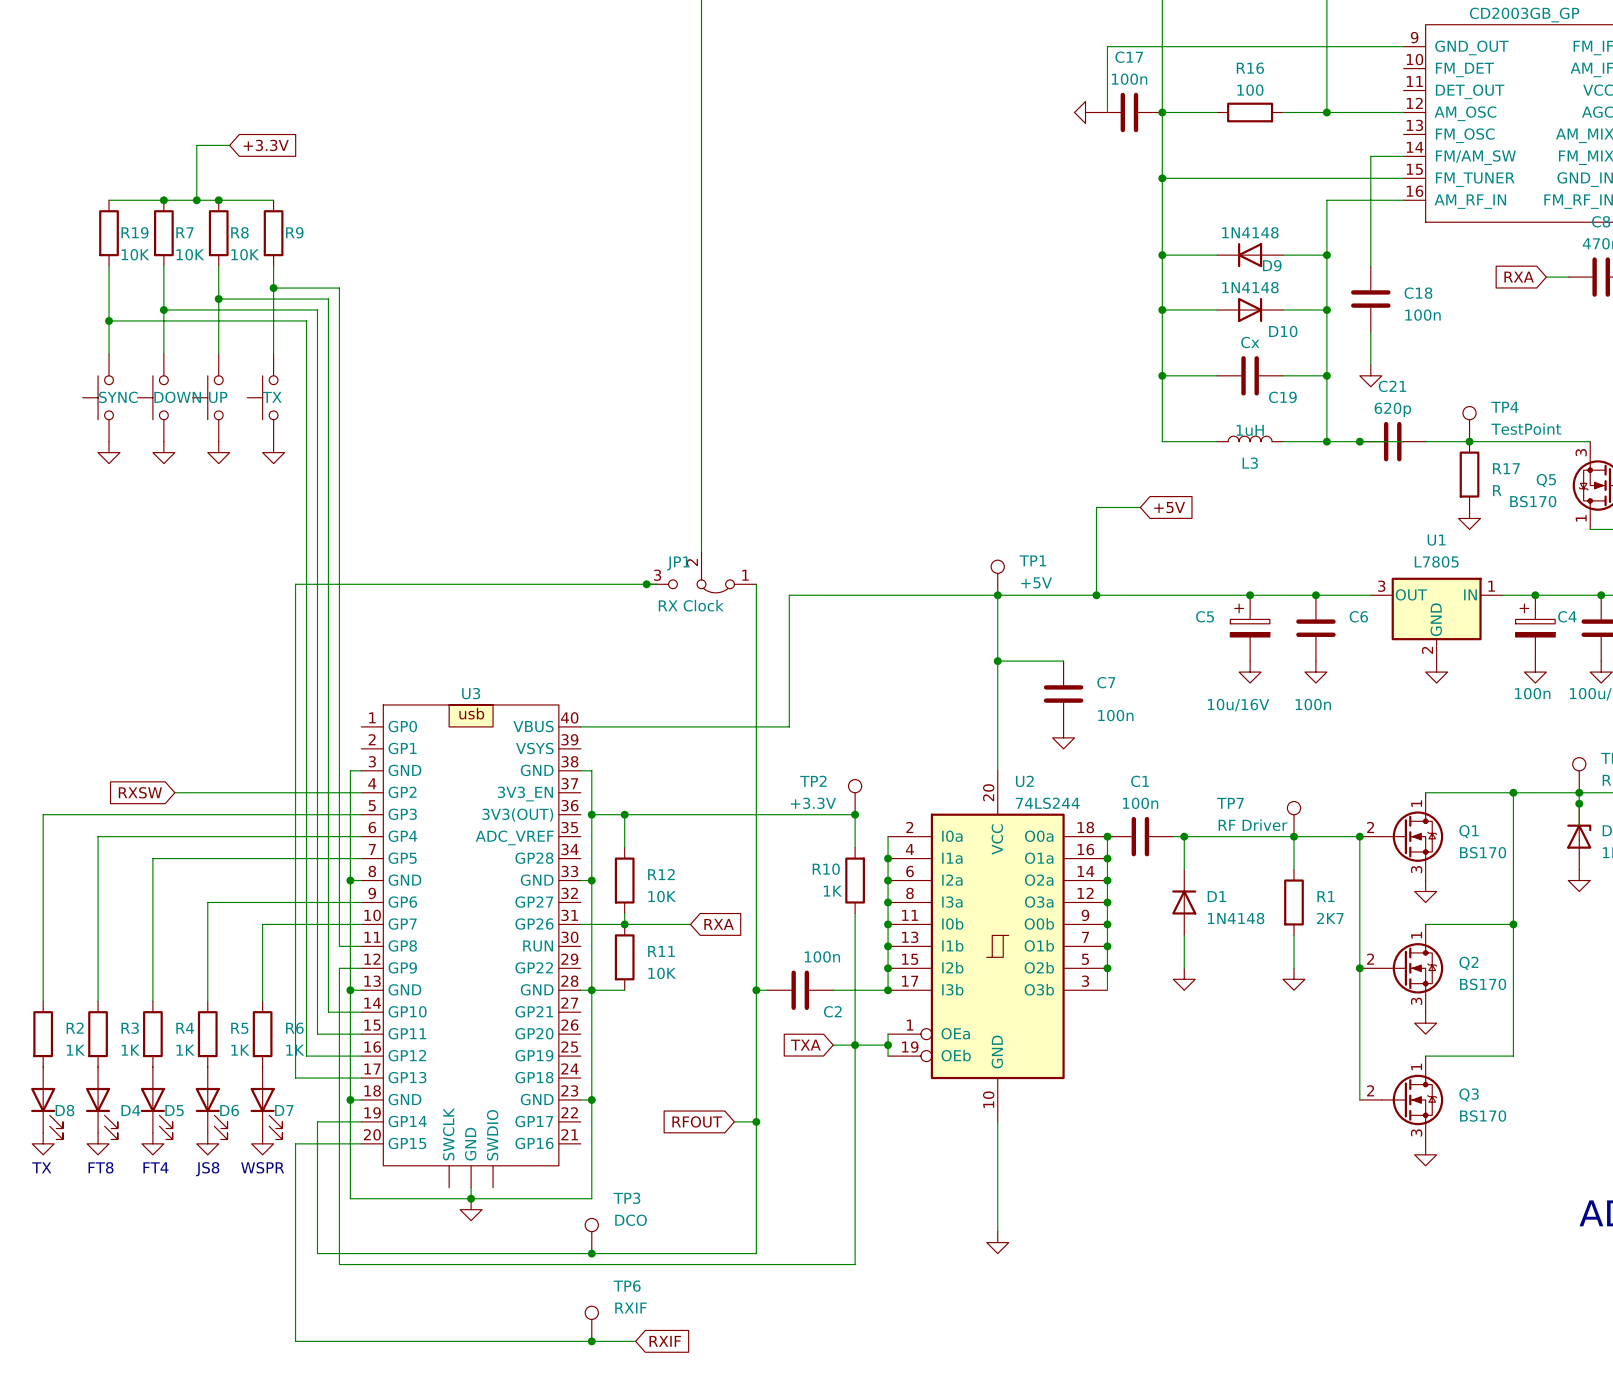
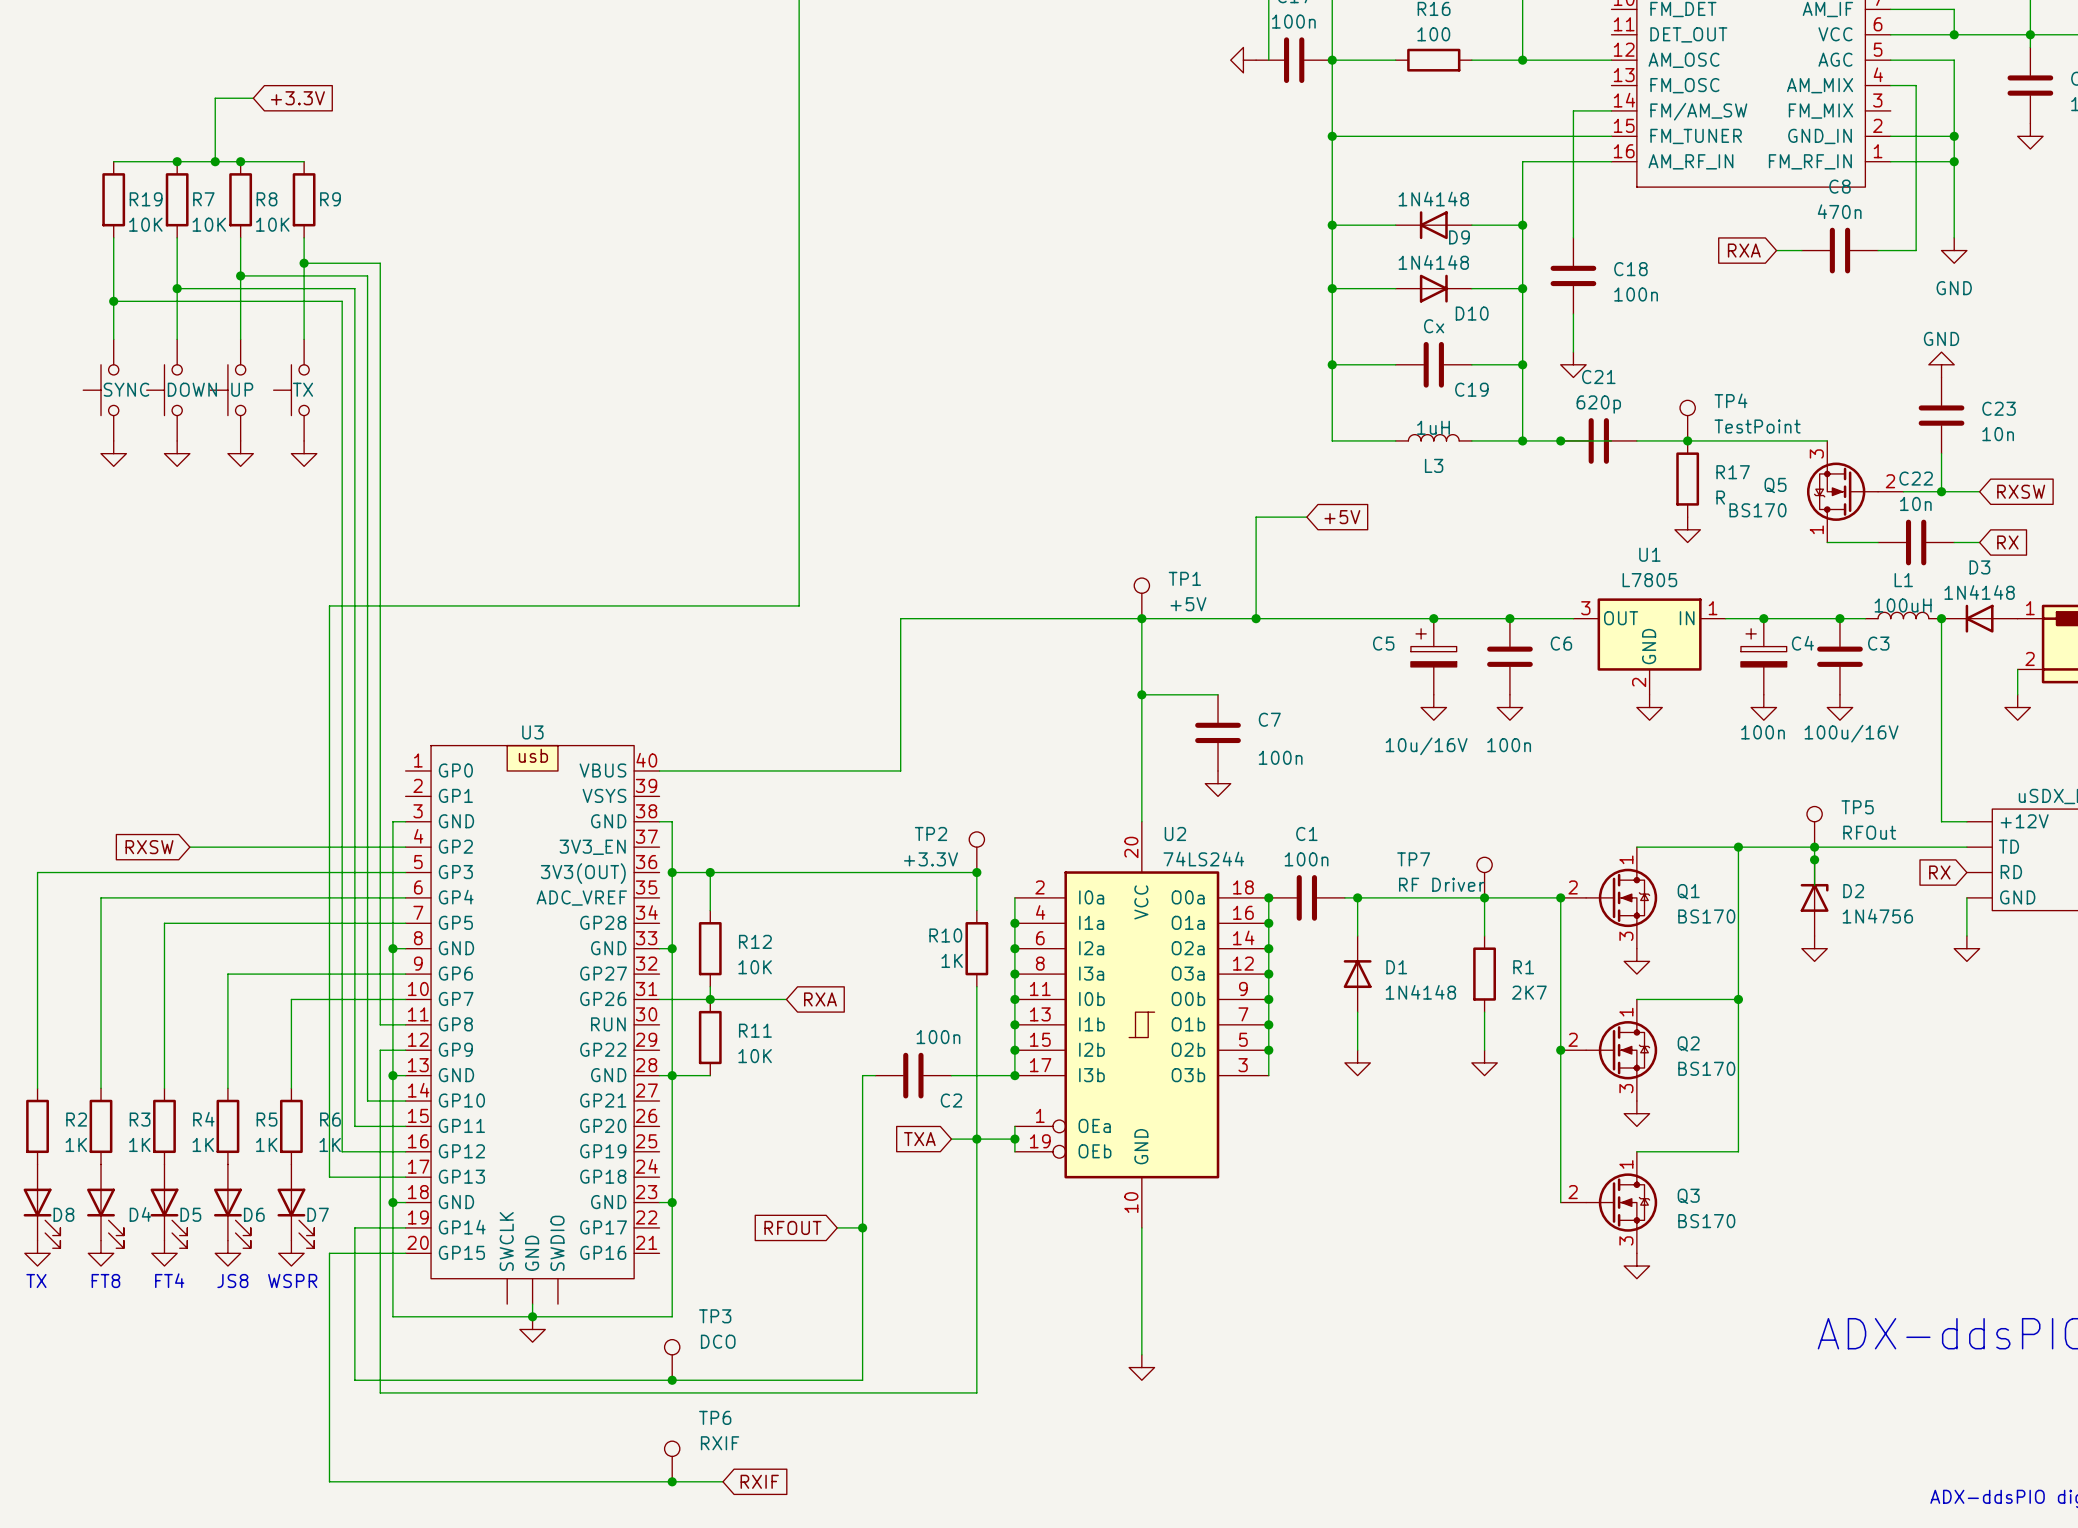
wire: none -> (799, 567) (799, 605) (748, 605)
JP1: RX Clock (701, 572) -> none
junction: (646, 584) -> none
wire: (756, 584) (756, 990) -> none
junction: (756, 990) -> none

